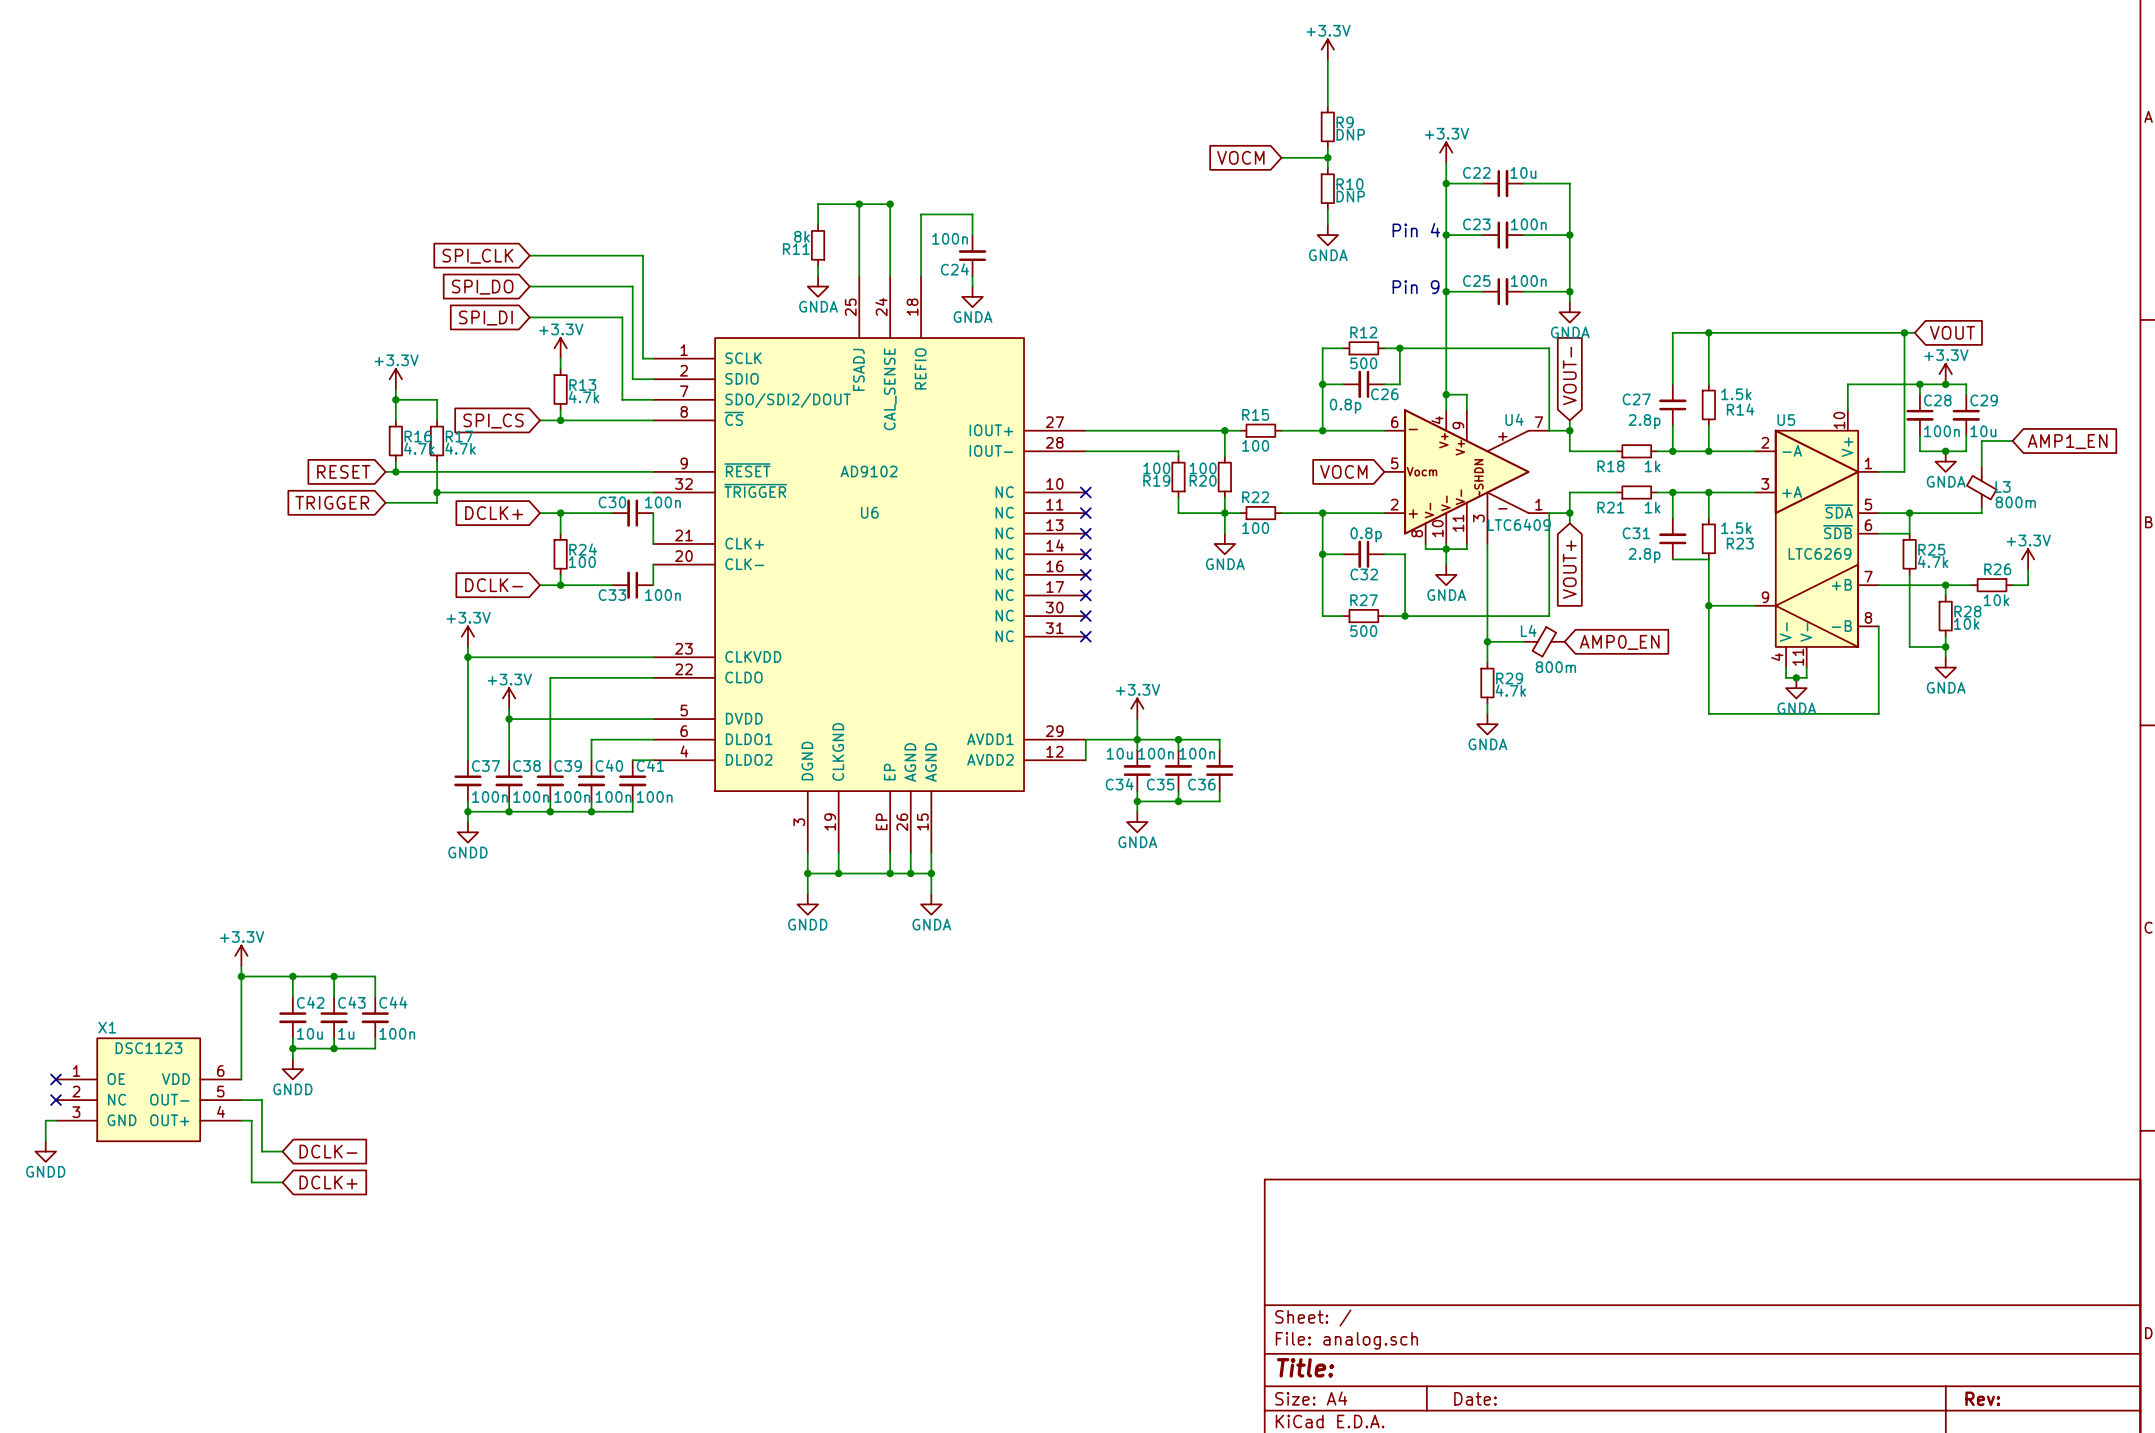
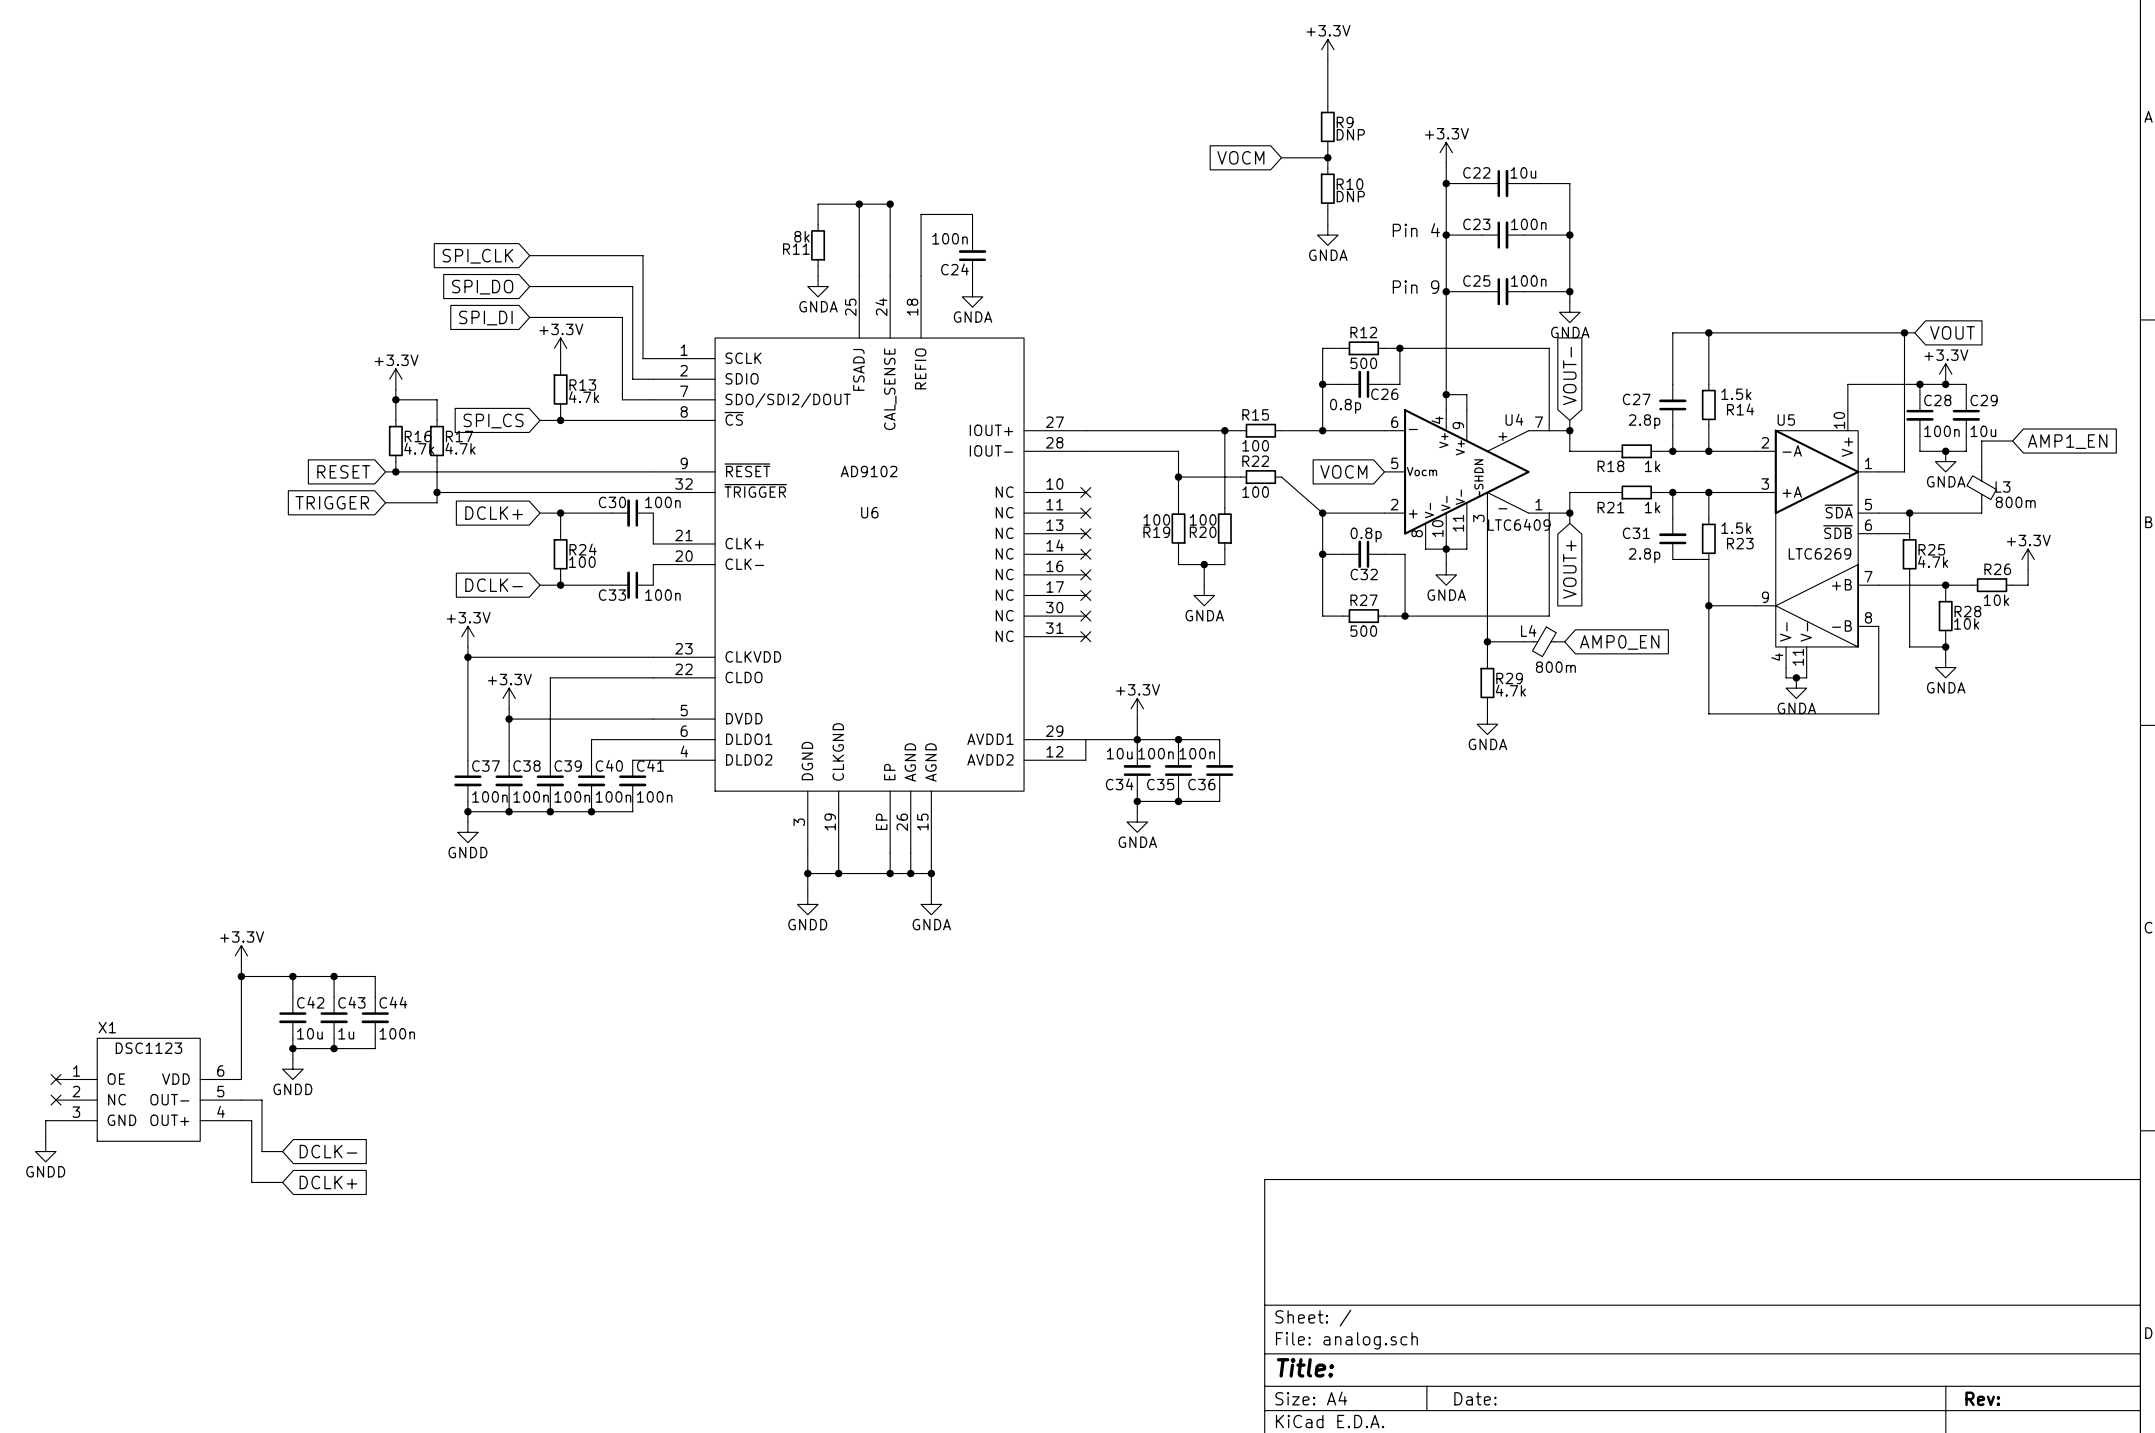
wire: none -> (1178, 456) (1178, 497)
wire: none -> (1224, 456) (1224, 497)
wire: none -> (1178, 477) (1240, 477)
R19 position: (1178, 477) -> (1178, 528)
junction: none -> (1178, 477)
R20 position: (1224, 477) -> (1224, 528)
wire: (1178, 507) (1178, 513) (1240, 513) -> none
wire: (1224, 507) (1224, 533) -> none
junction: (1224, 513) -> none
R22 position: (1260, 513) -> (1260, 477)
wire: (1281, 513) (1322, 513) -> (1281, 477) (1322, 513)
power symbol position: GNDA (1224, 543) -> GNDA (1204, 595)
wire: none -> (1178, 549) (1178, 564) (1224, 564) (1224, 549)
wire: none -> (1204, 564) (1204, 585)
junction: none -> (1204, 564)

